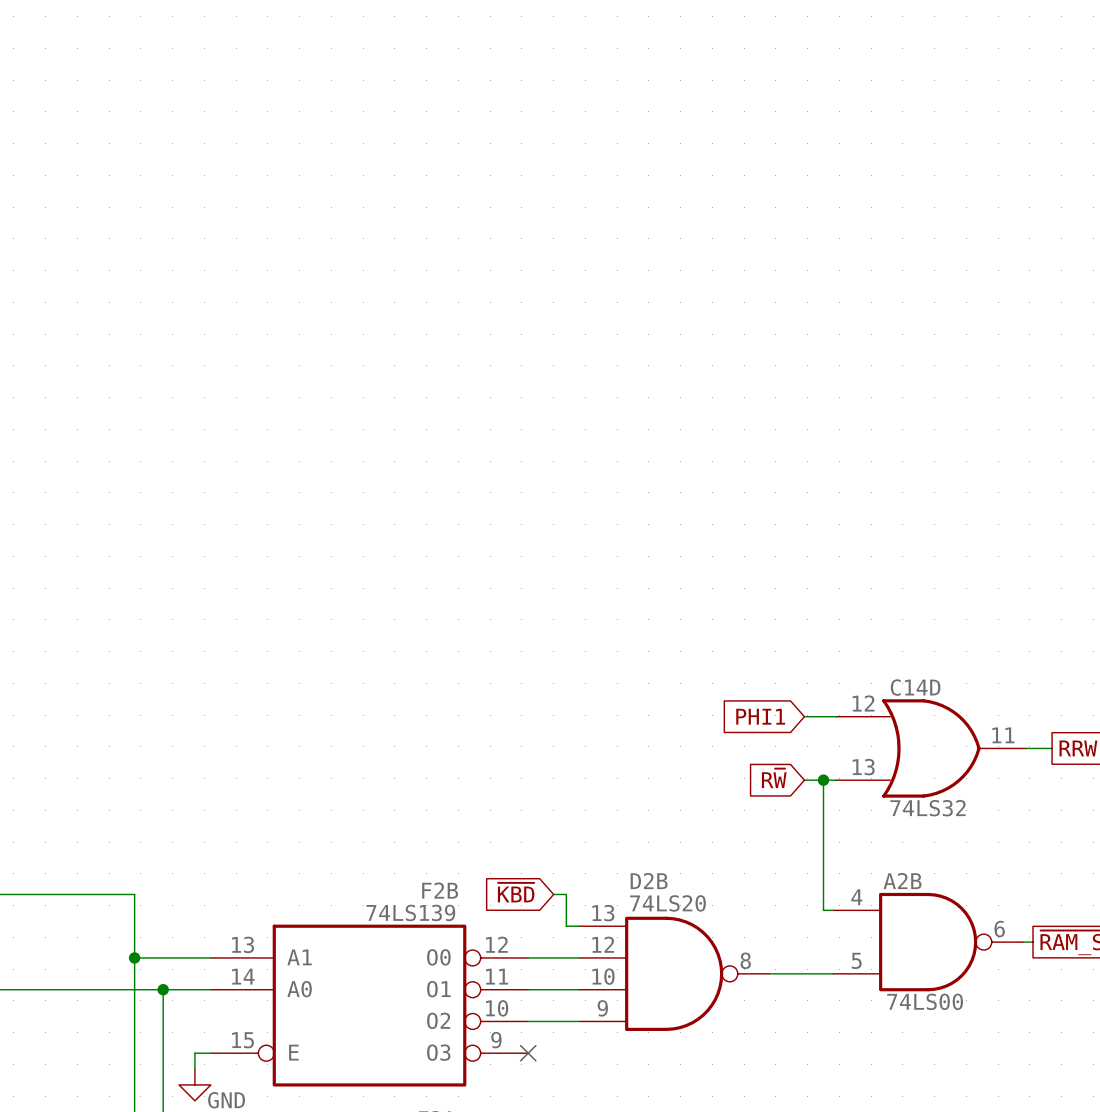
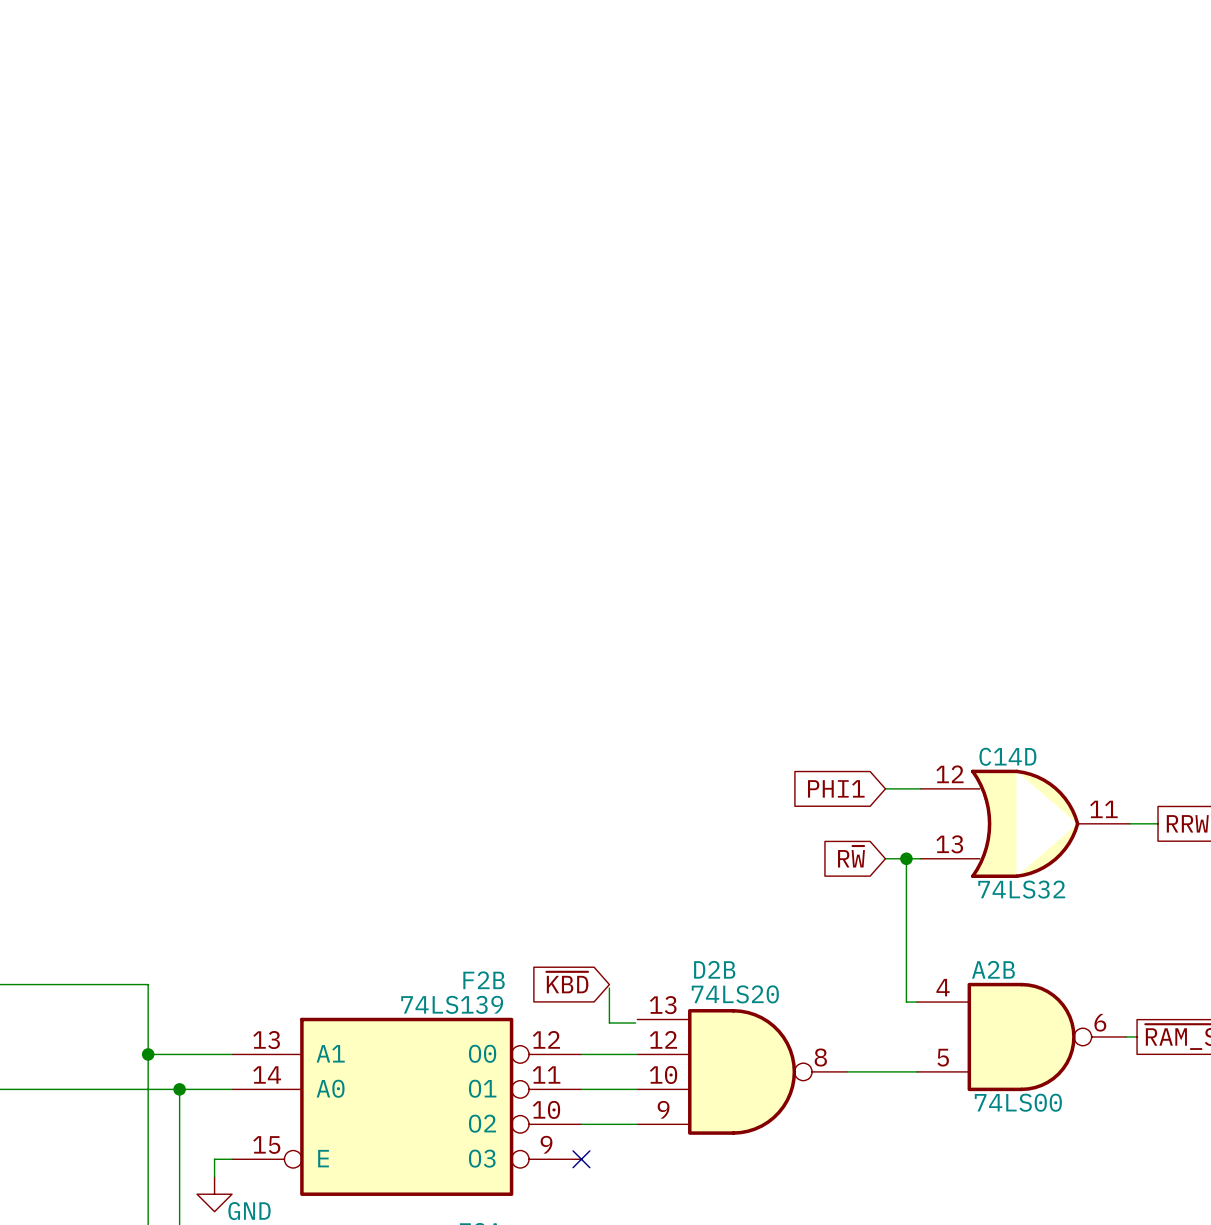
wire: (553, 894) (566, 894) (566, 926) (579, 926) -> none
wire: none -> (609, 988) (609, 1023) (635, 1023)

